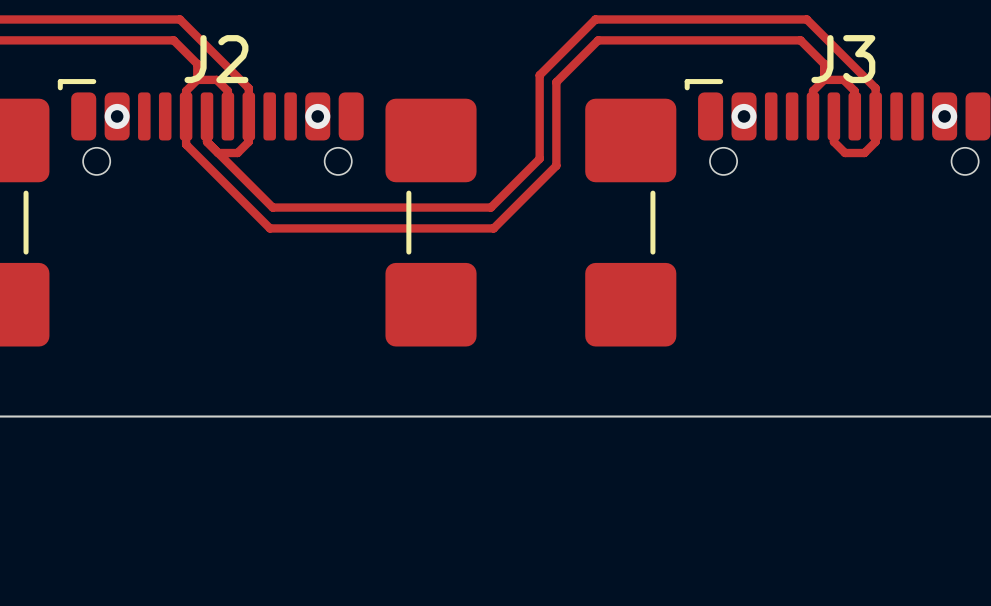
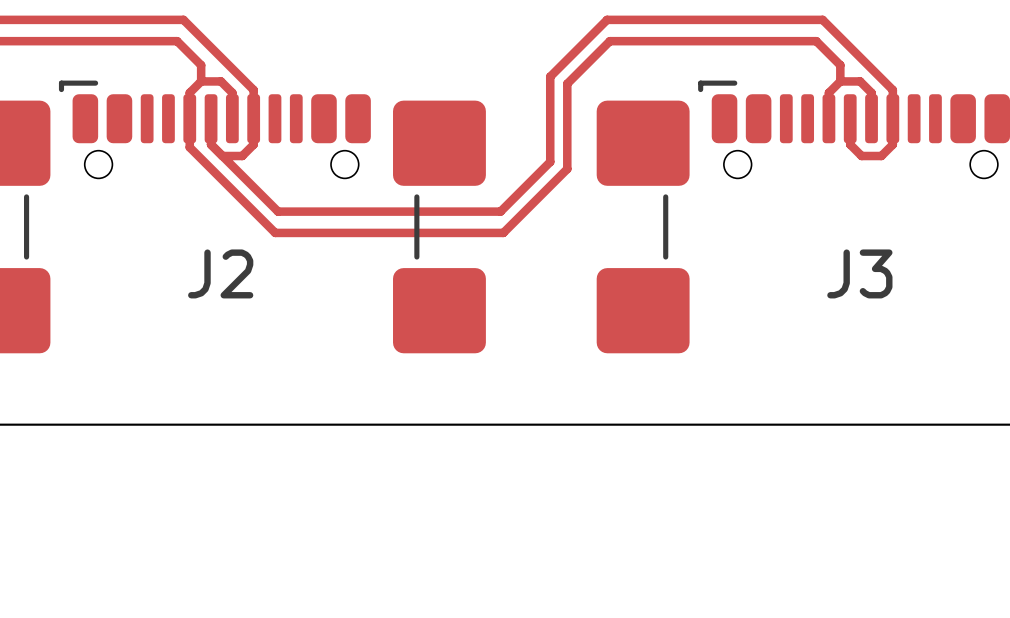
J2 name position: J2 (216, 59) -> J2 (220, 273)
J3 name position: J3 (843, 59) -> J3 (859, 273)
via: (117, 116) -> none
via: (317, 116) -> none
via: (744, 116) -> none
via: (944, 116) -> none

